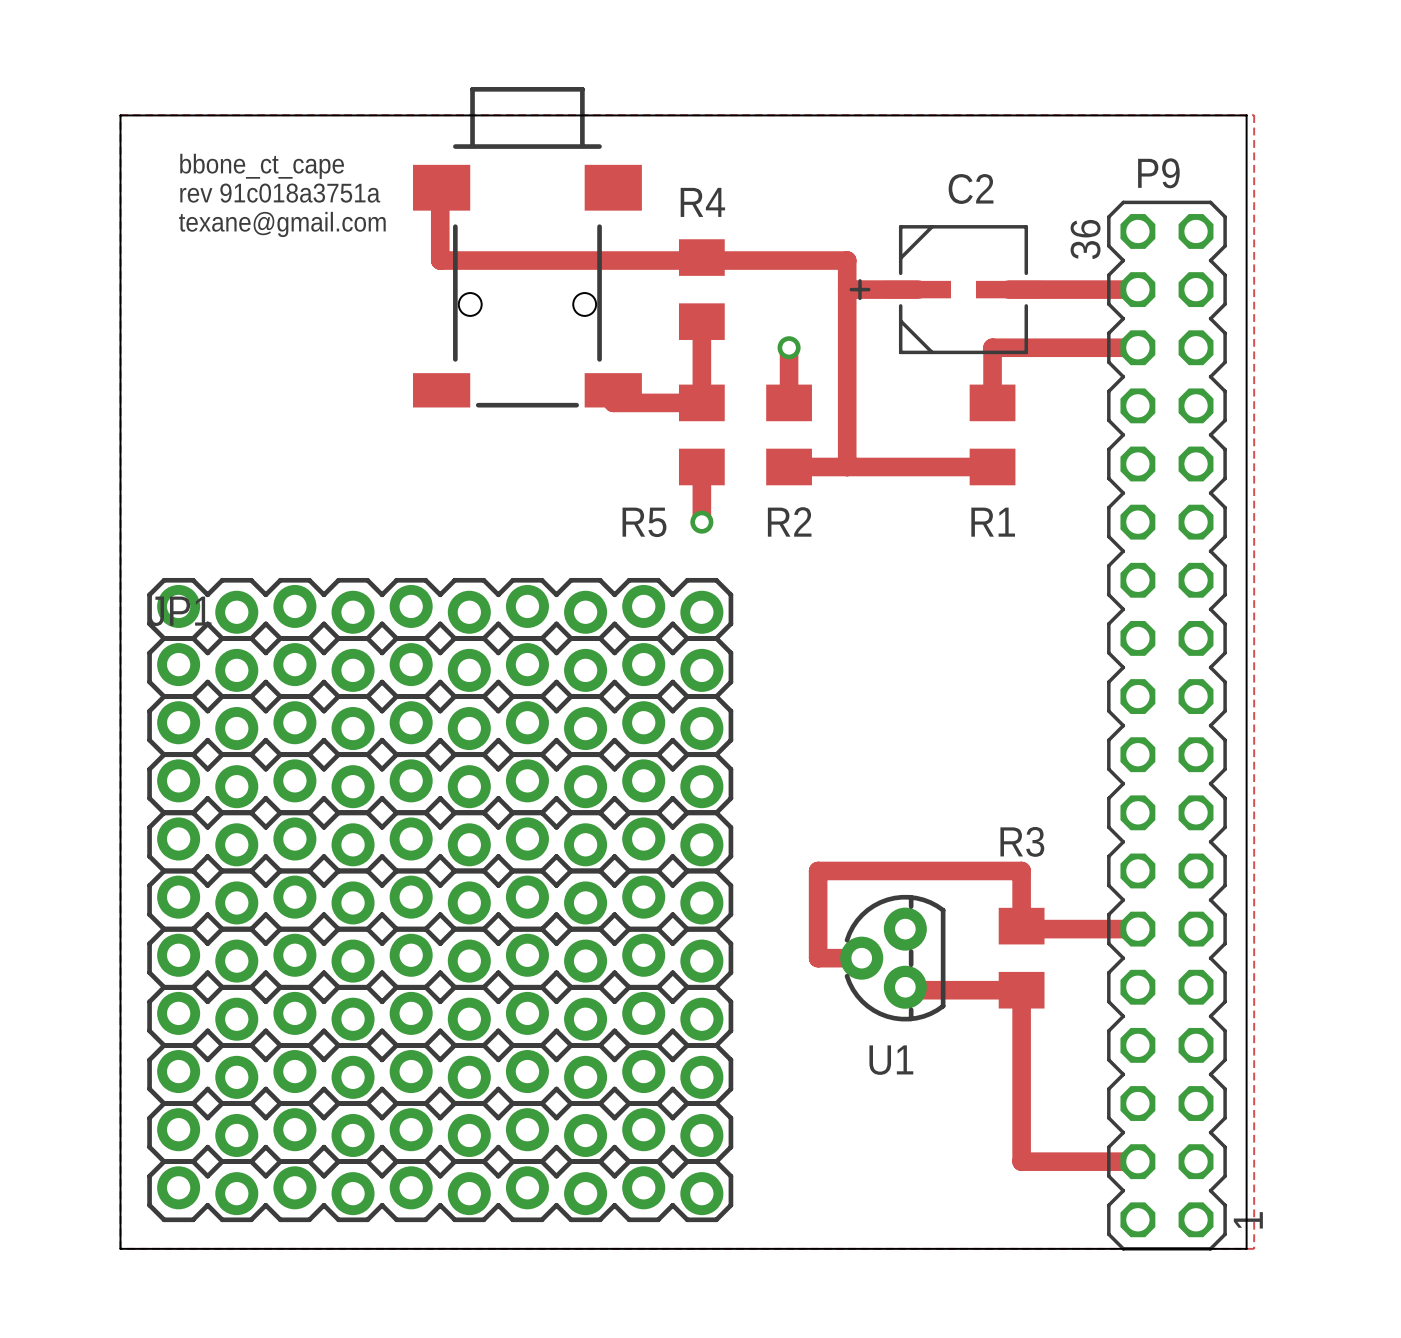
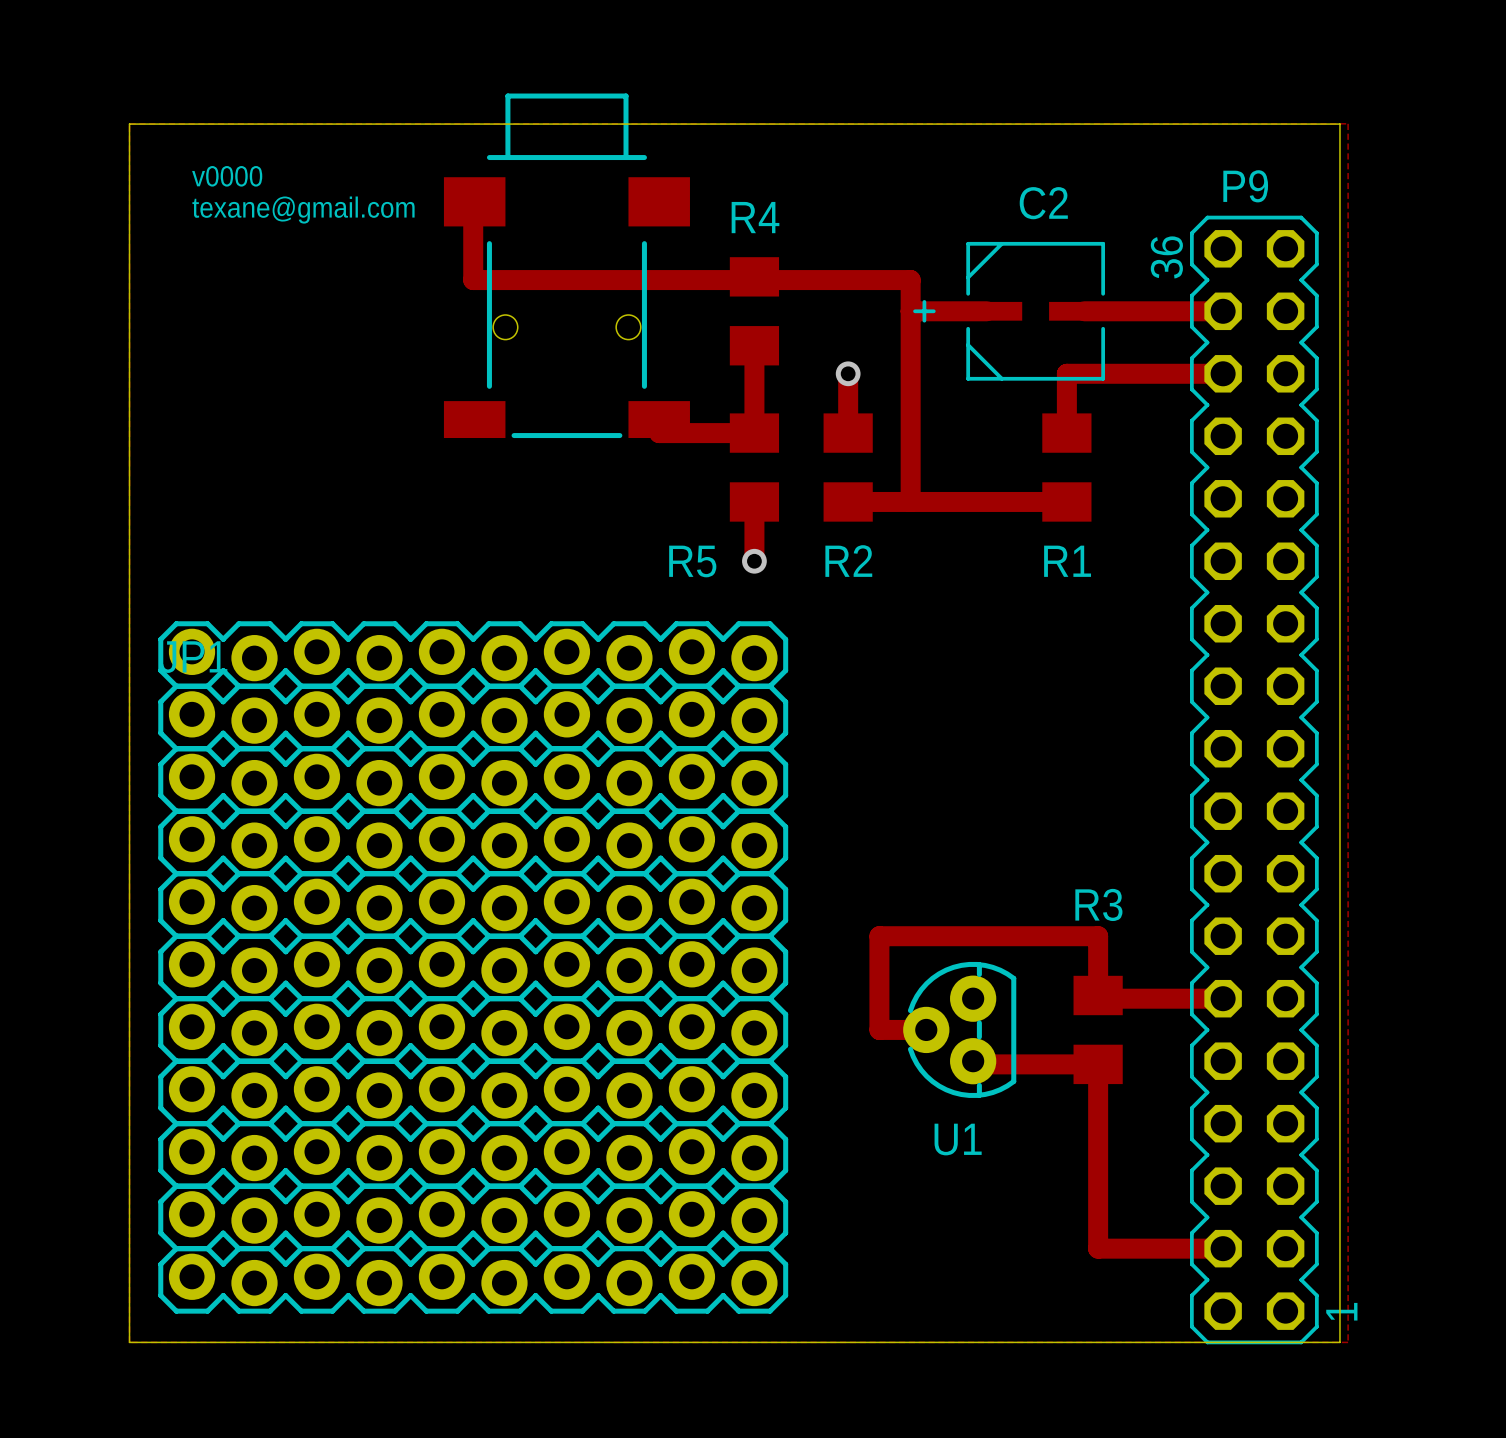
text: bbone_ct_cape (262, 166) -> v0000 (227, 176)
text: rev 91c018a3751a (280, 193) -> texane@gmail.com (303, 210)
text: texane@gmail.com (282, 224) -> none

